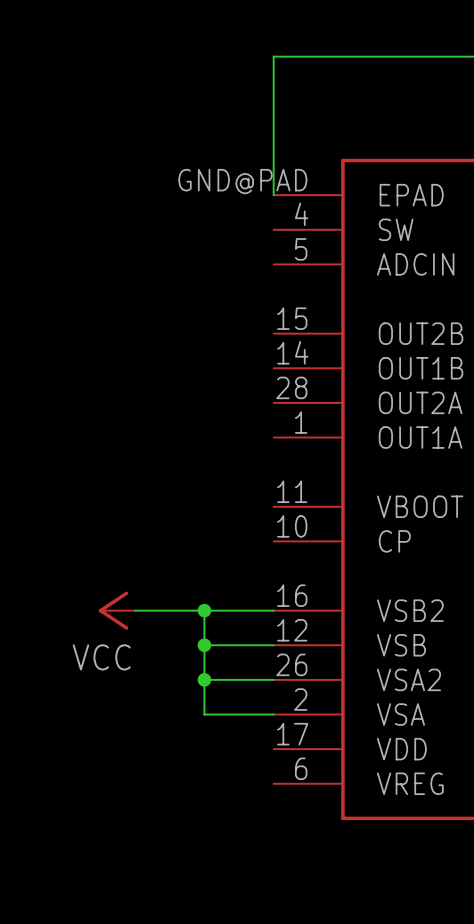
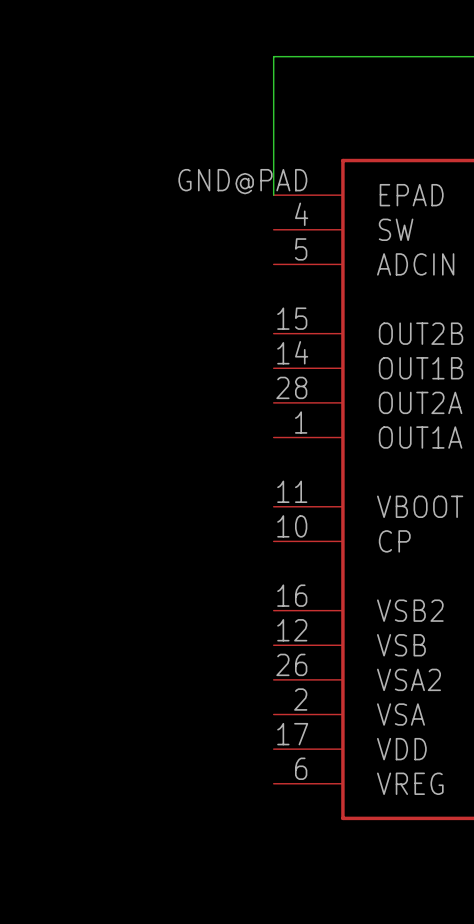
power symbol: VCC (117, 610) -> none
wire: (135, 610) (273, 610) -> none
wire: (204, 610) (204, 714) (273, 714) -> none
junction: (204, 610) -> none
wire: (204, 645) (273, 645) -> none
junction: (204, 645) -> none
wire: (204, 679) (273, 679) -> none
junction: (204, 679) -> none

